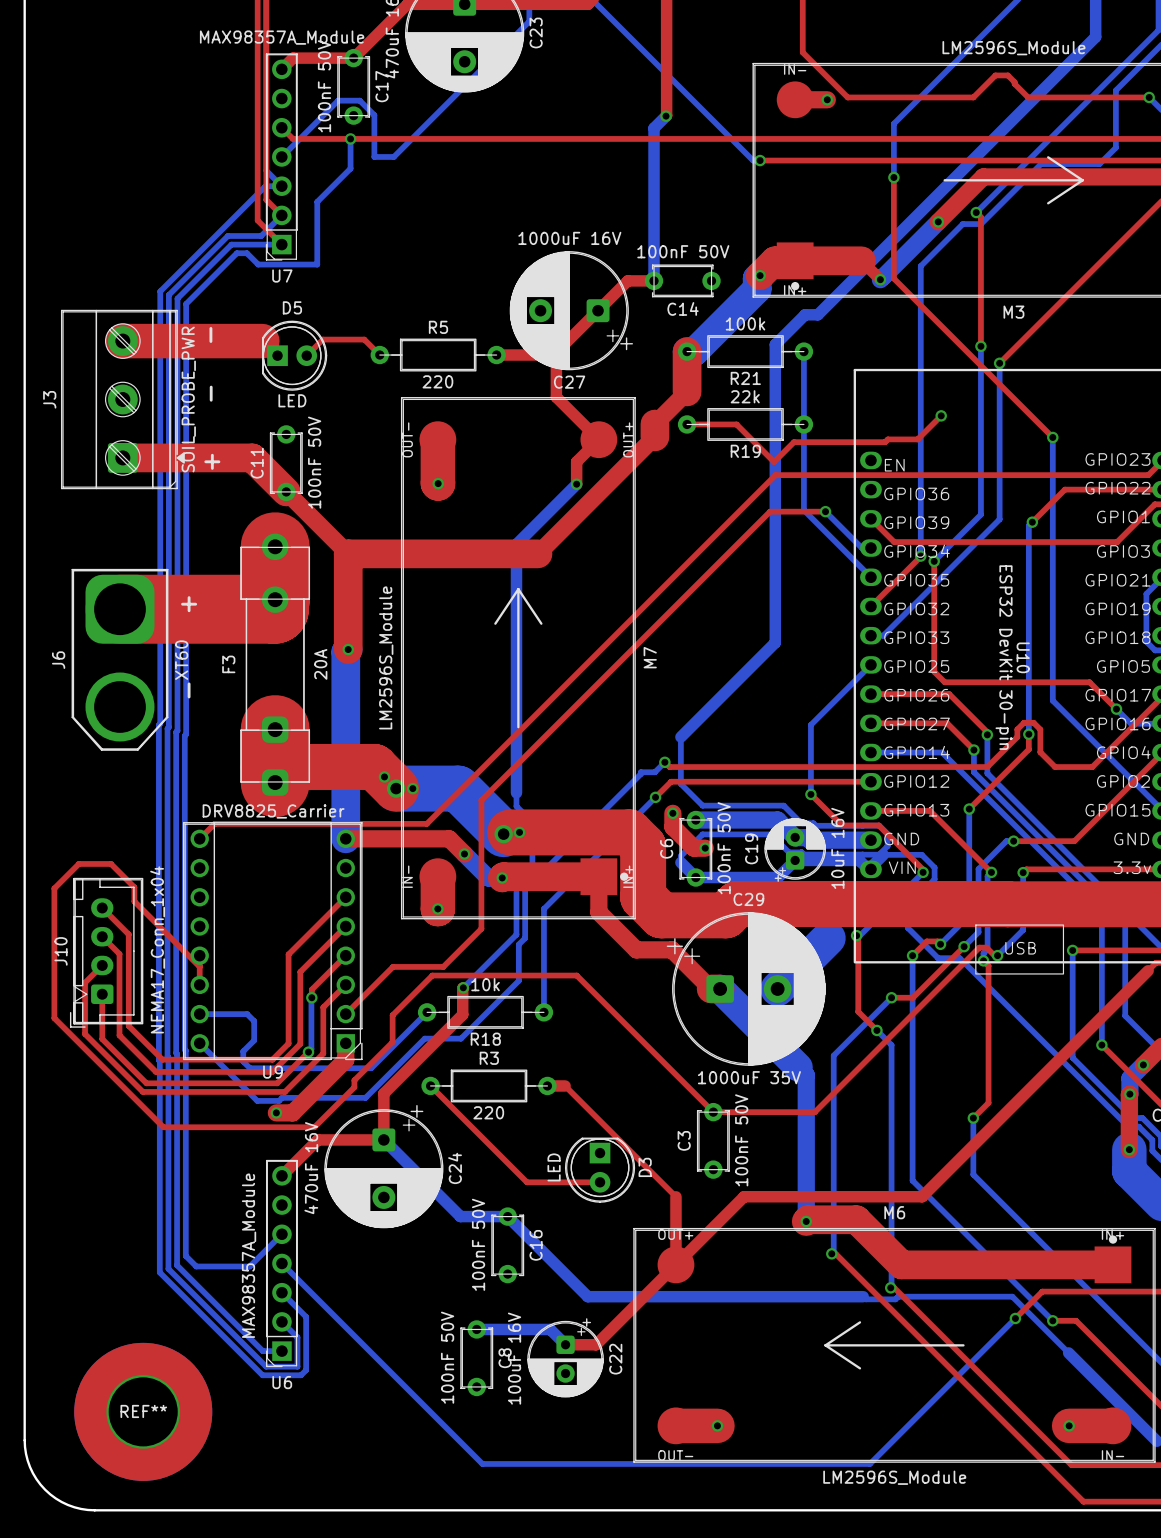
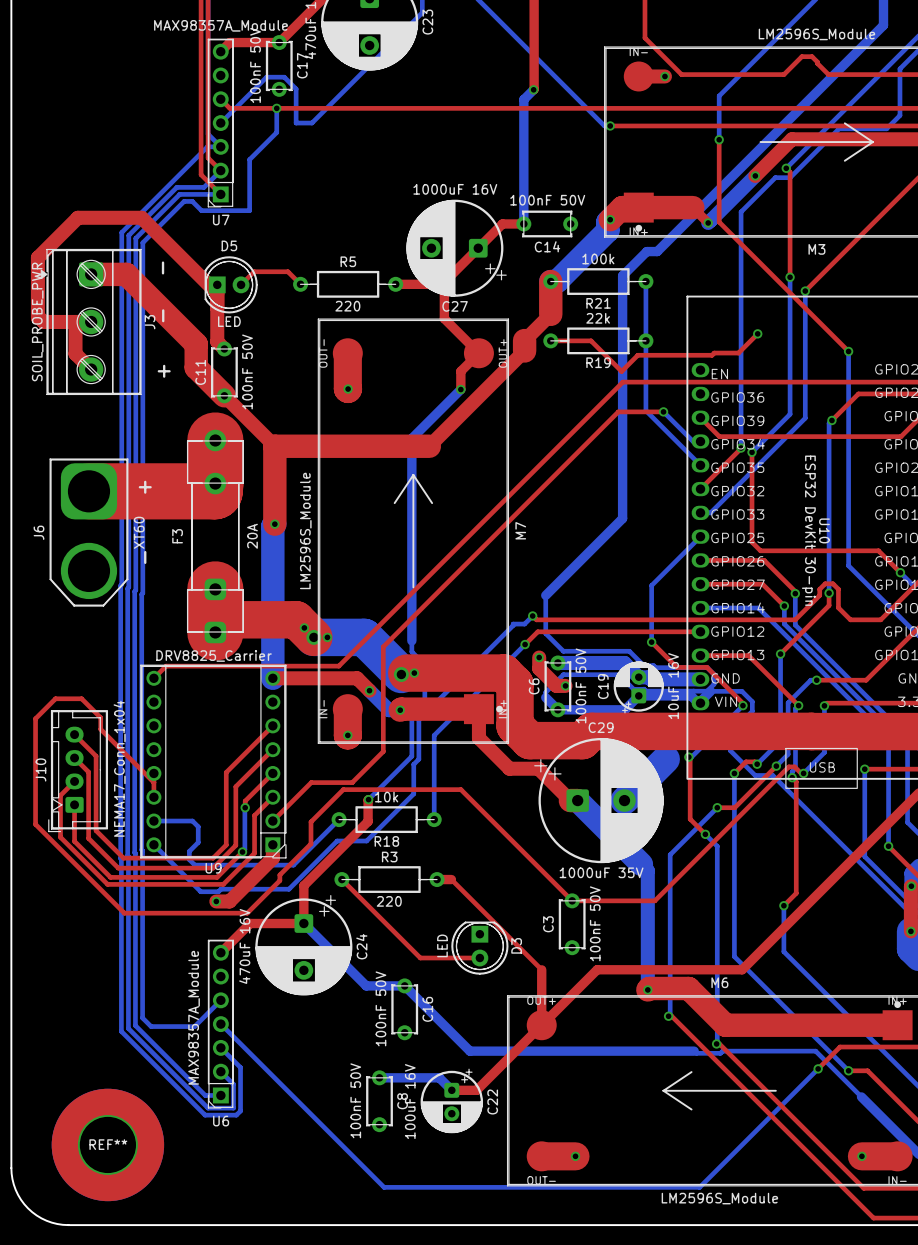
top track: (122, 341) (262, 341) (276, 355) -> none
top track: none -> (217, 284) (217, 341) (224, 348)
top track: none -> (217, 293) (141, 217) (77, 217) (37, 257) (37, 317) (43, 321) (91, 321)
J3 rotation: 0° (122, 399) -> 180° (91, 321)
top track: none -> (75, 321) (75, 353) (91, 369)
top track: (122, 457) (252, 457) -> (91, 274) (126, 274) (196, 344) (196, 368)

